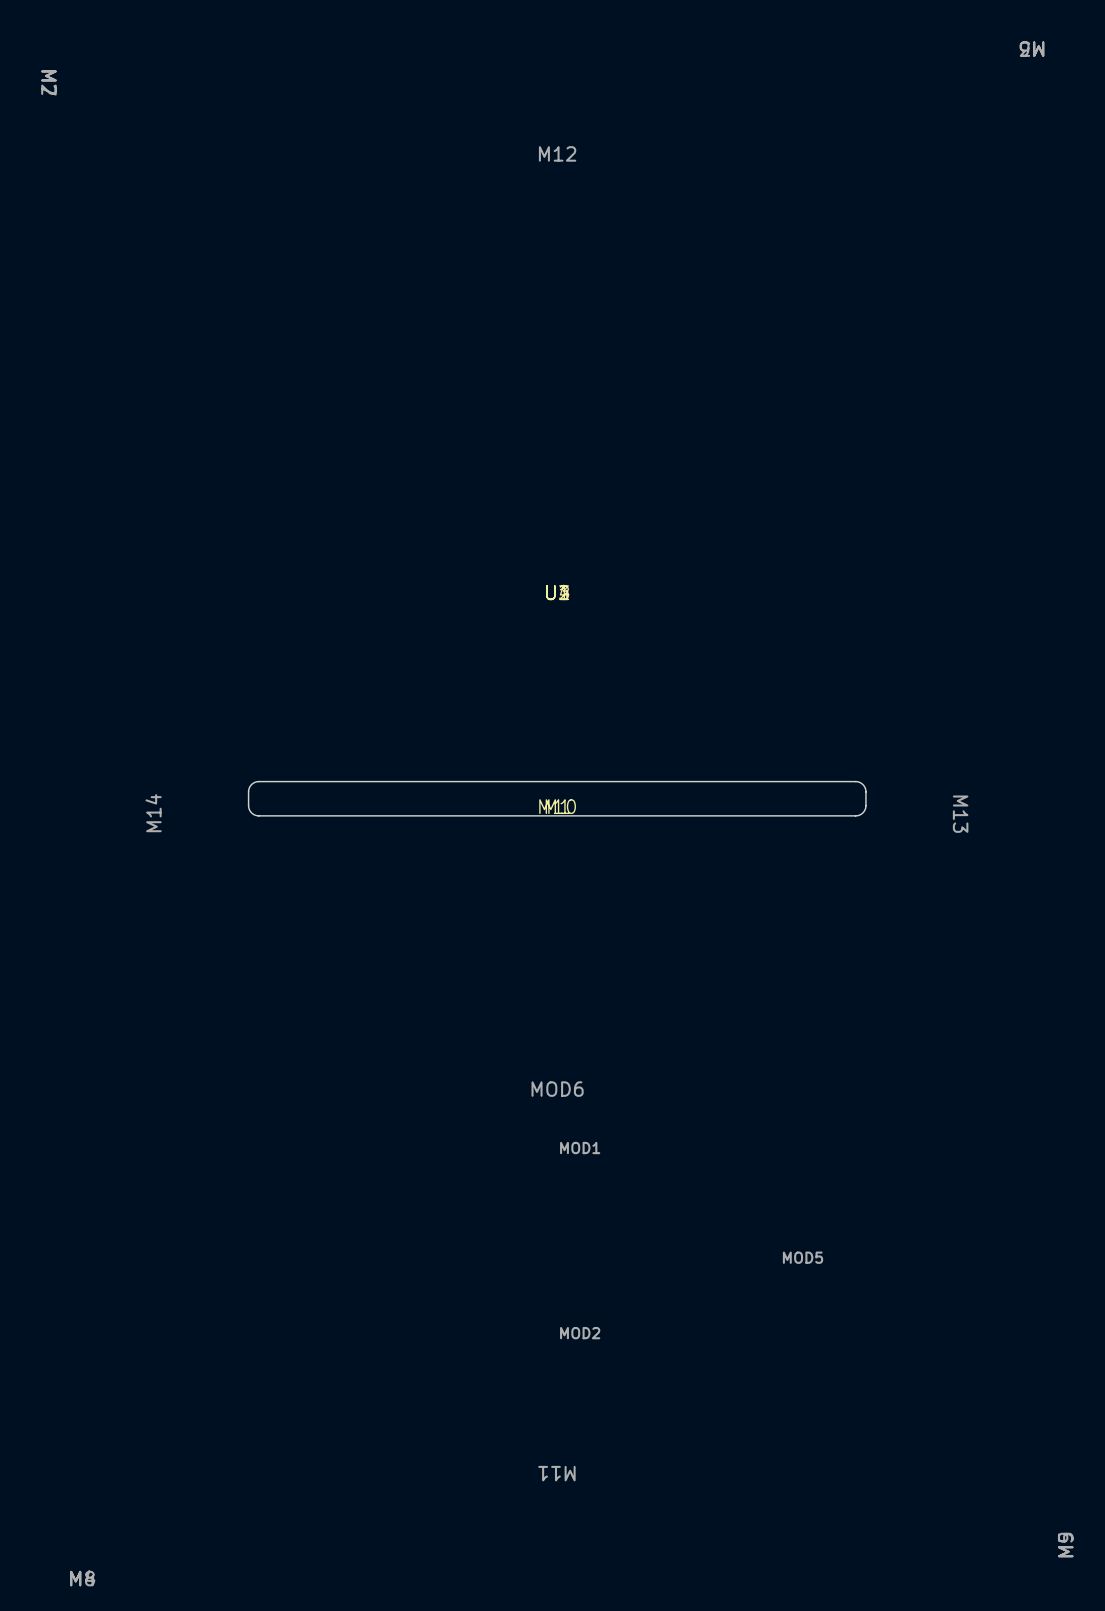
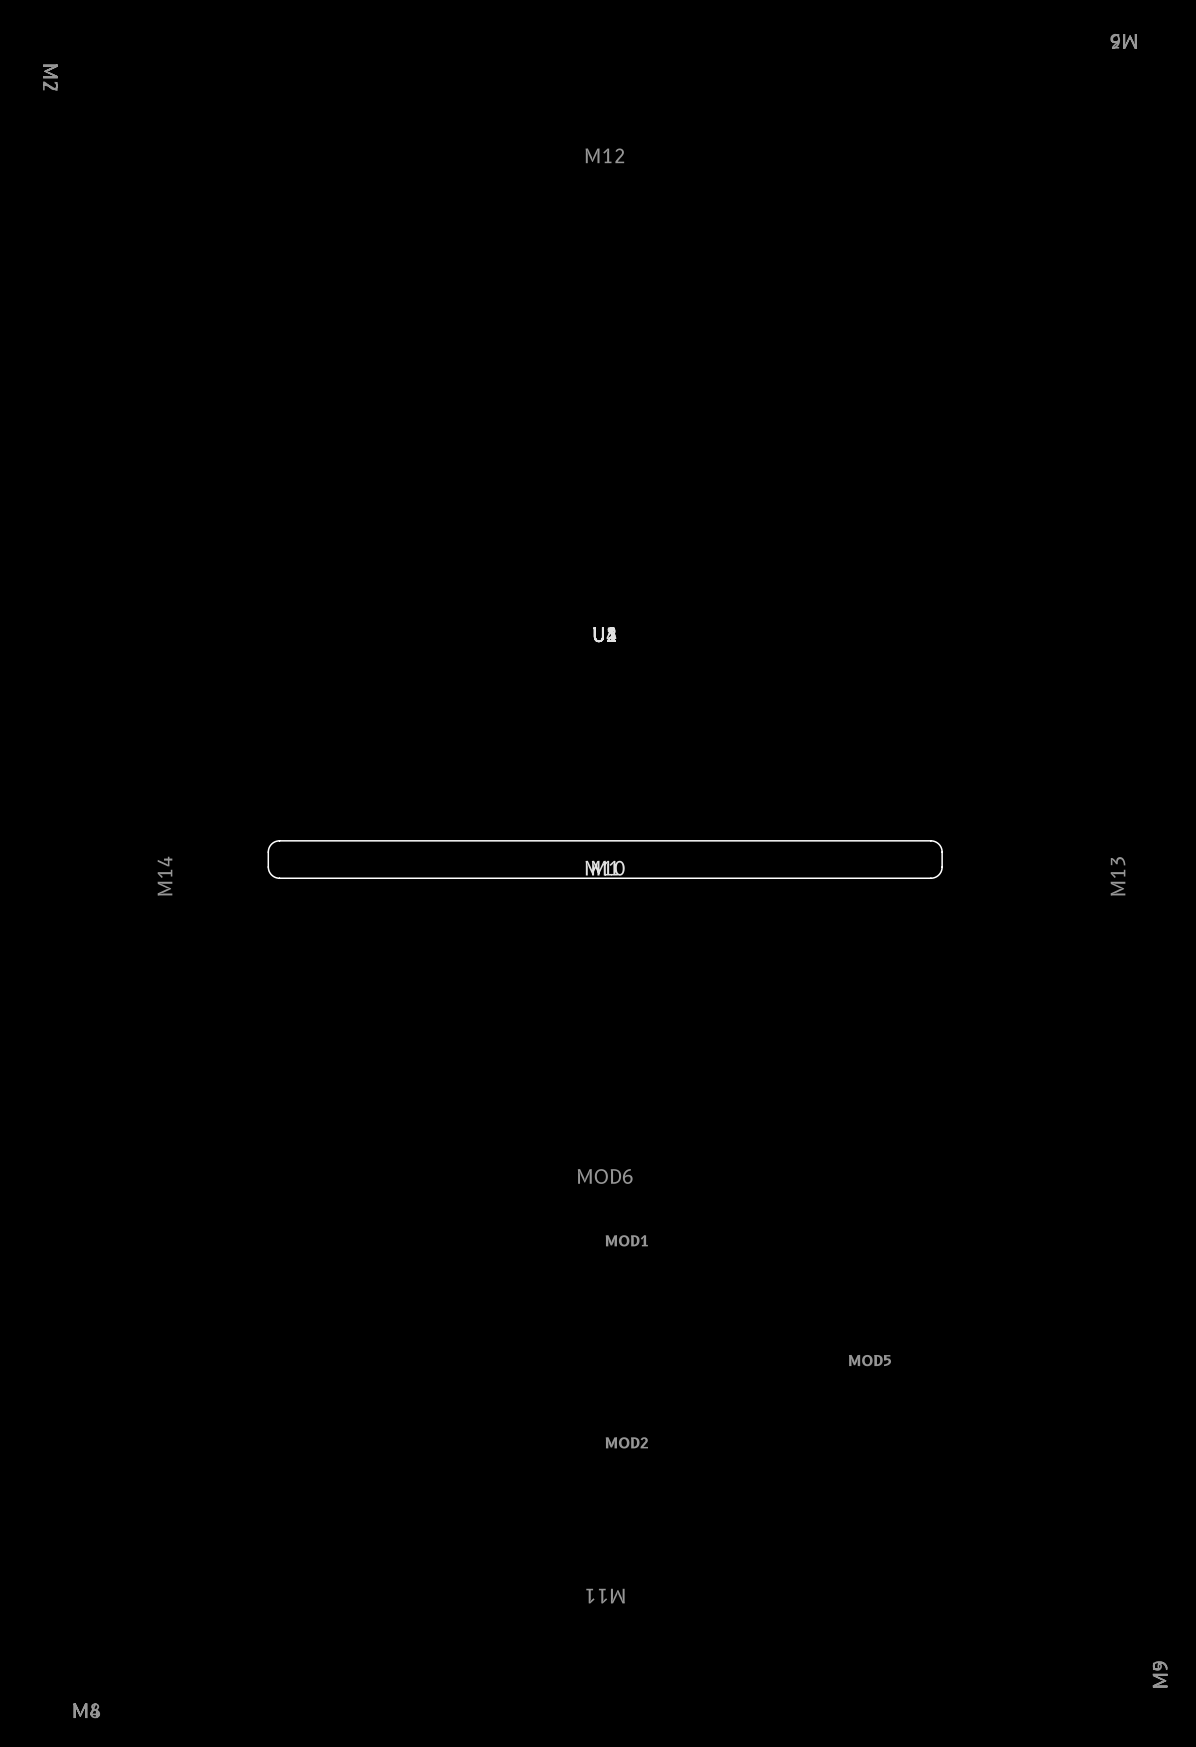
M13 position: (960, 814) -> (1117, 876)
M13 name rotation: 0° (960, 814) -> 180° (1117, 876)

